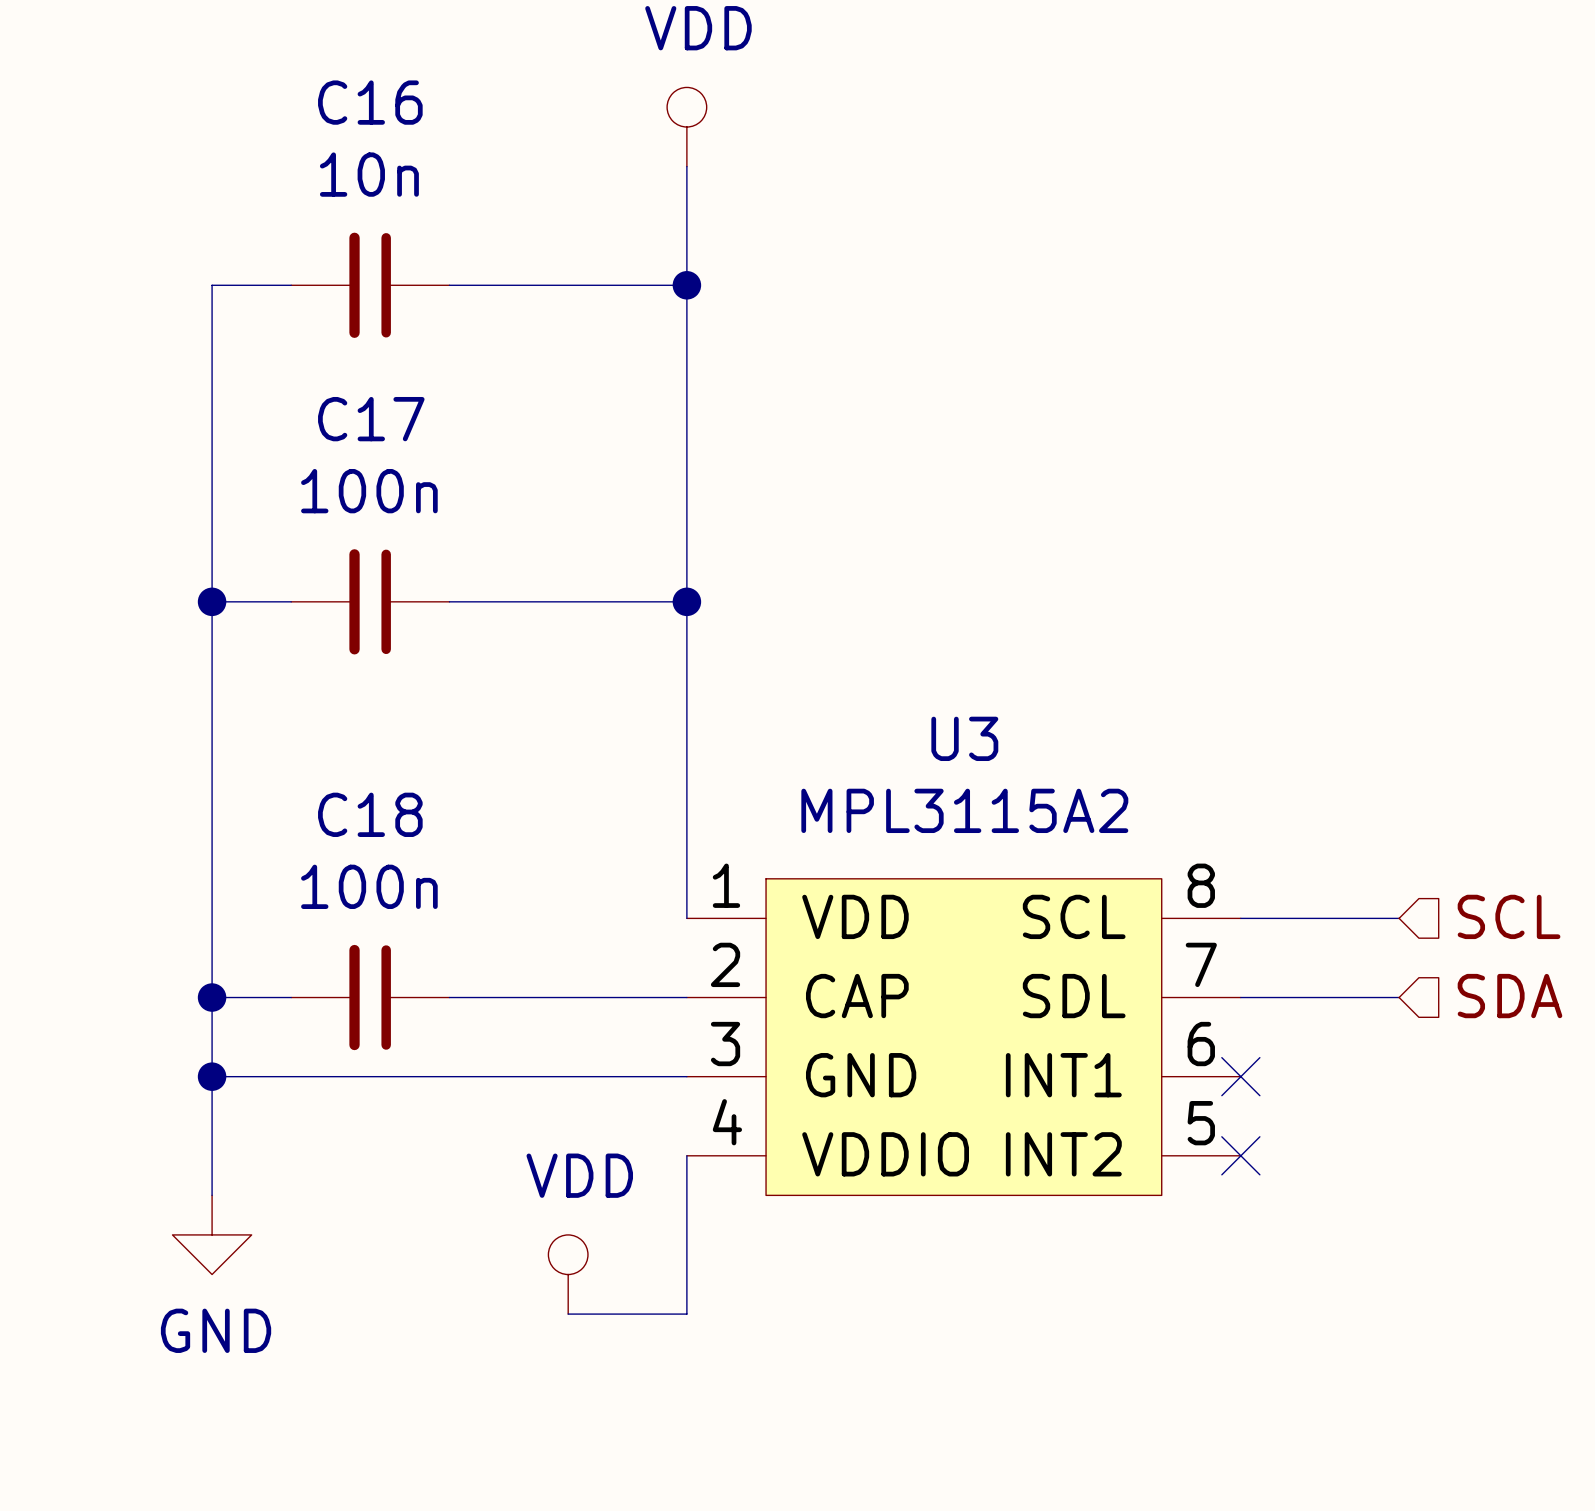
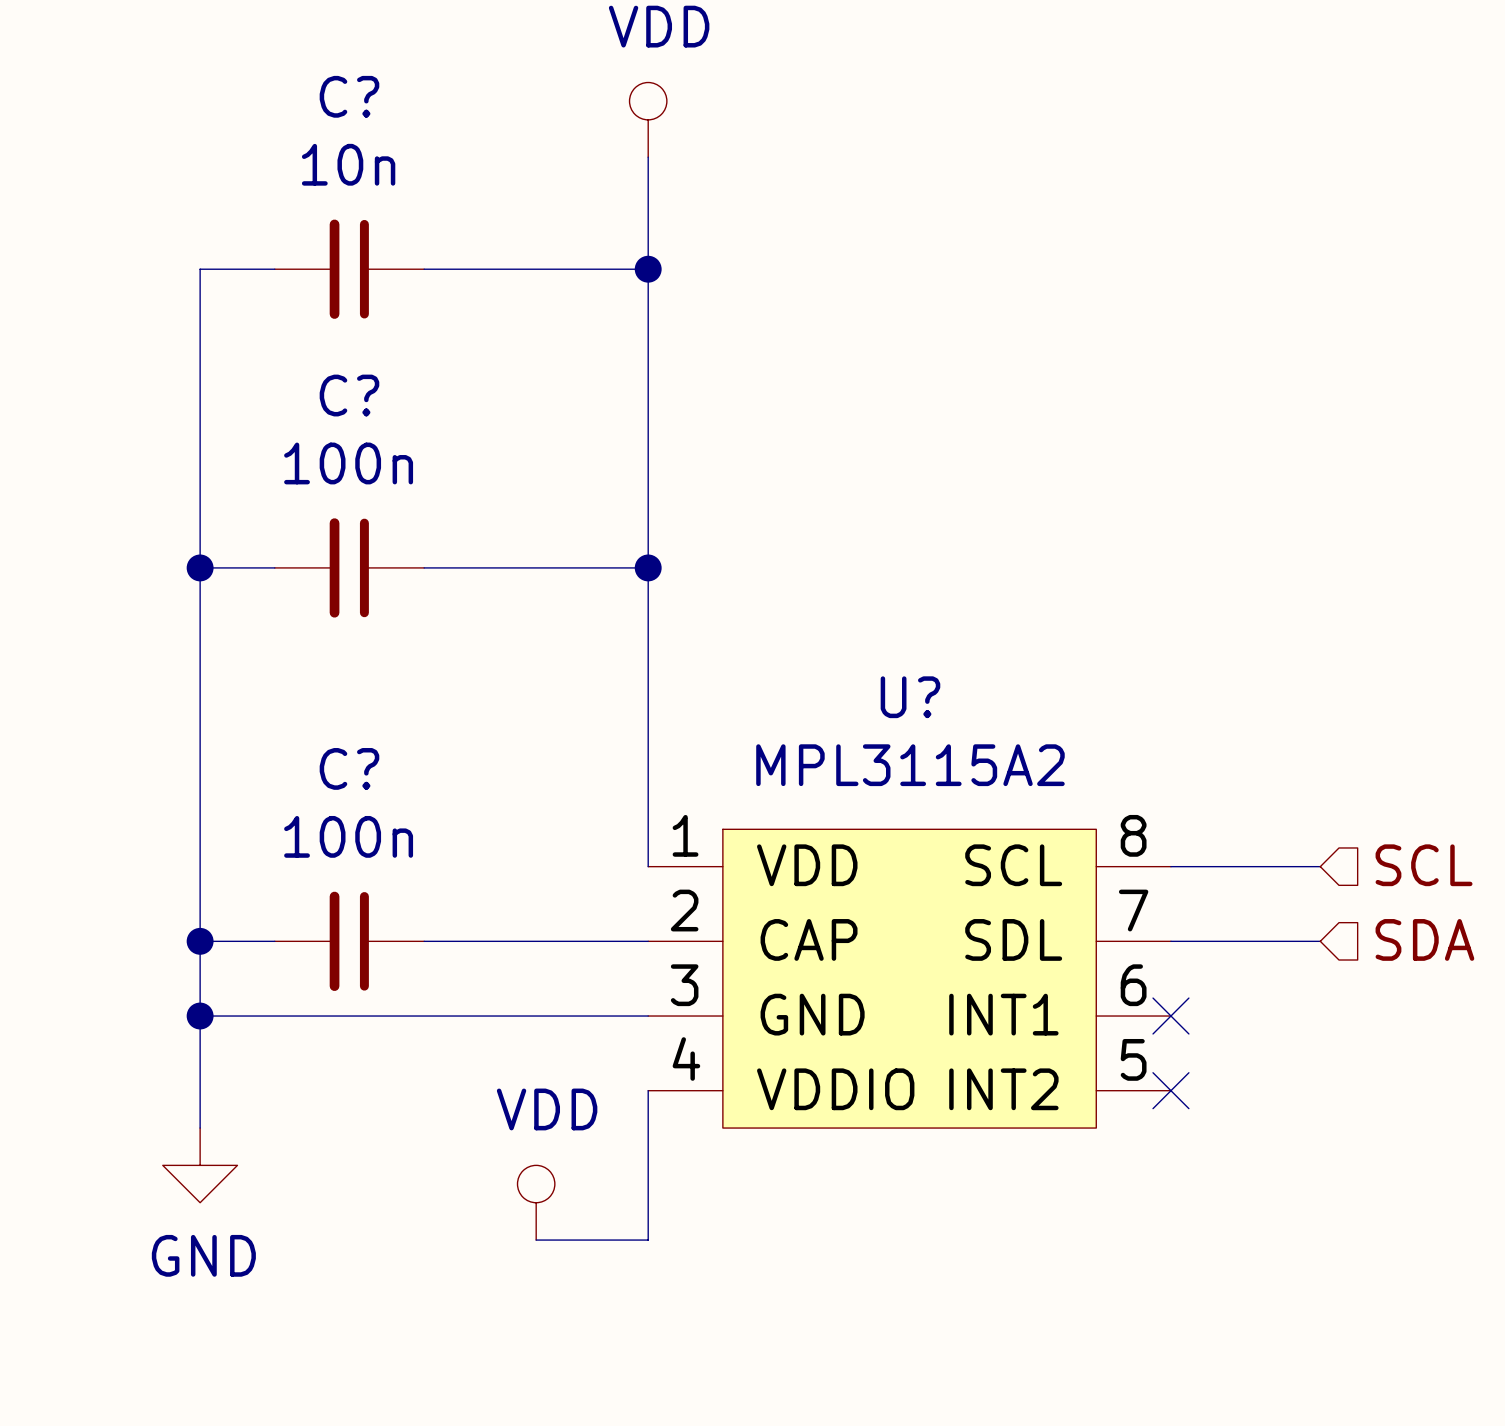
C16 name: C16 (370, 102) -> C? (349, 96)
C17 name: C17 (371, 419) -> C? (349, 395)
U3 name: U3 (964, 738) -> U? (910, 697)
C18 name: C18 (370, 814) -> C? (349, 768)

